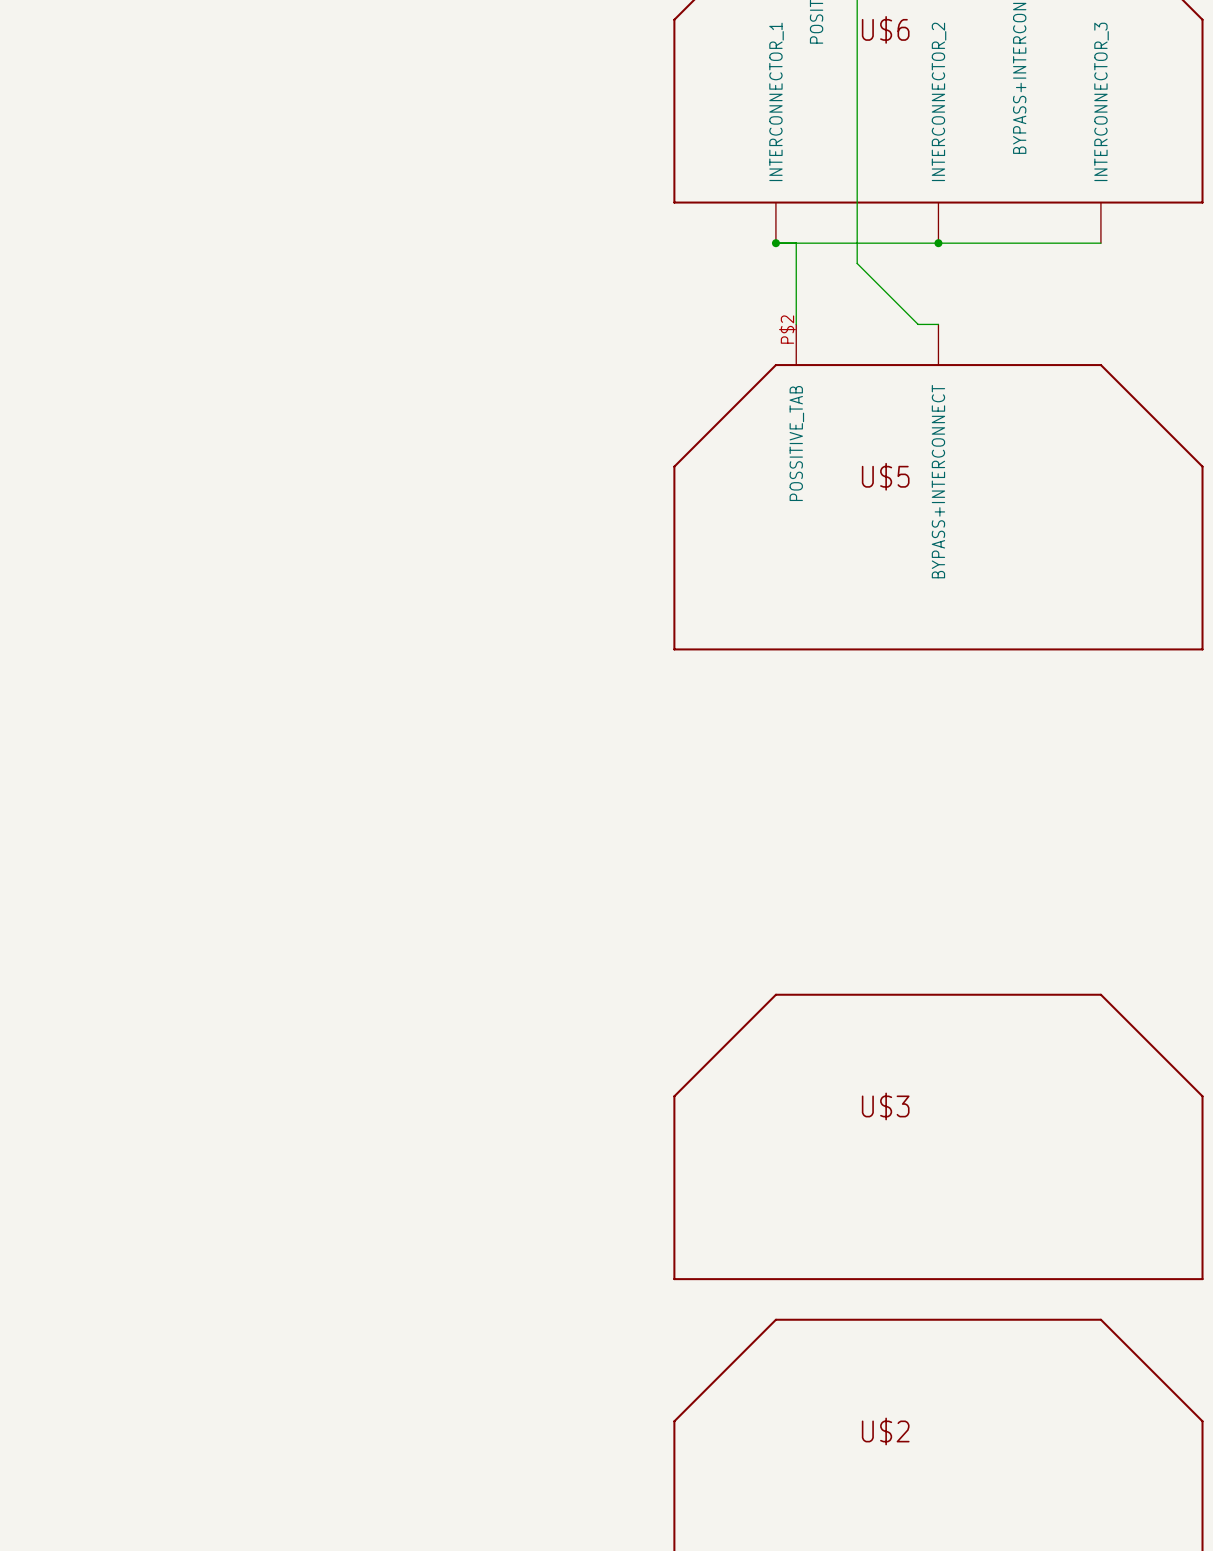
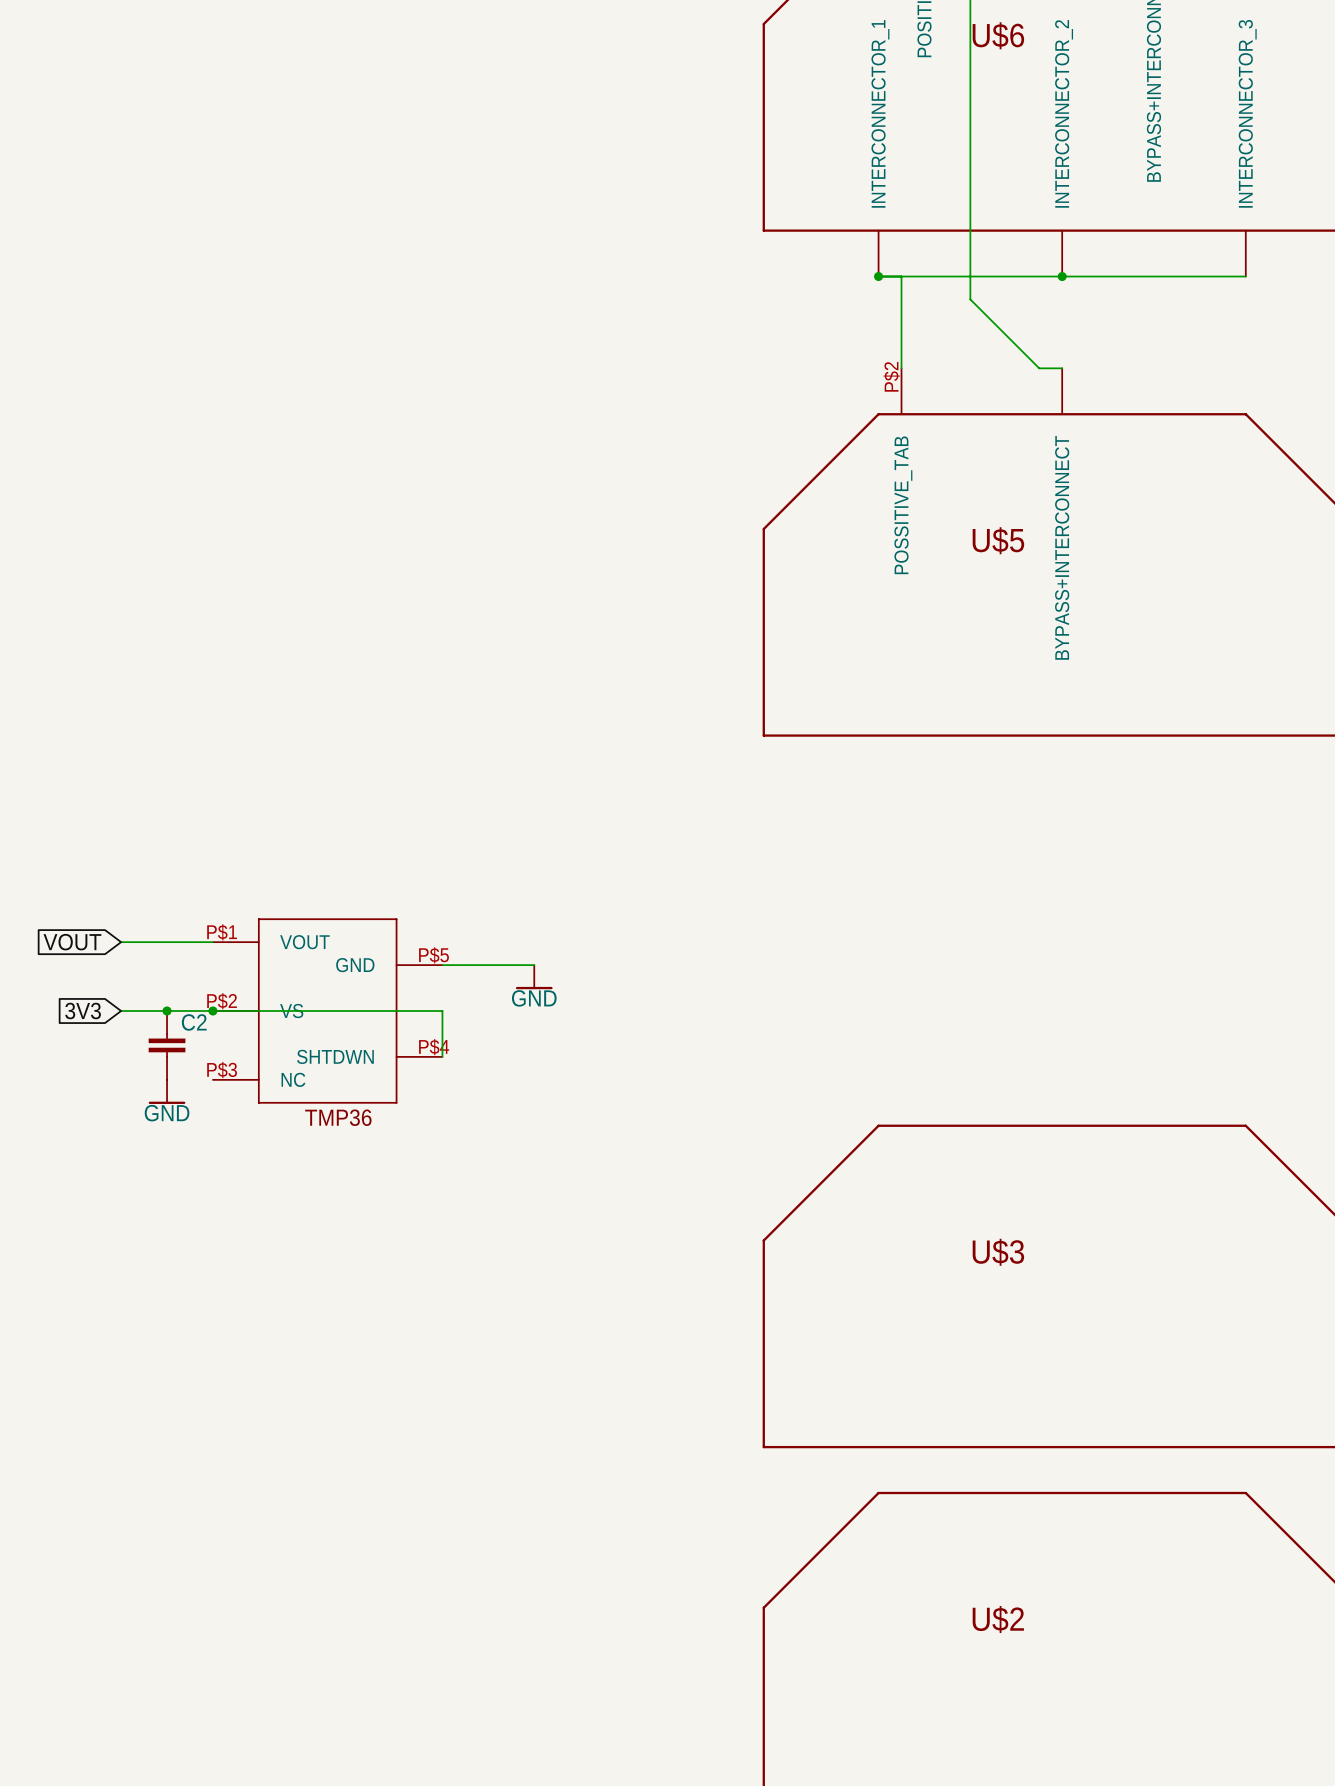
global label: none -> VOUT (72, 942)
wire: none -> (121, 942) (212, 942)
wire: none -> (442, 965) (534, 965)
power symbol: none -> GND (534, 977)
global label: none -> 3V3 (83, 1011)
wire: none -> (121, 1011) (442, 1011) (442, 1056)
junction: none -> (167, 1011)
junction: none -> (212, 1011)
part: none -> (327, 1011)
C2: none -> (167, 1045)
power symbol: none -> GND (167, 1091)

